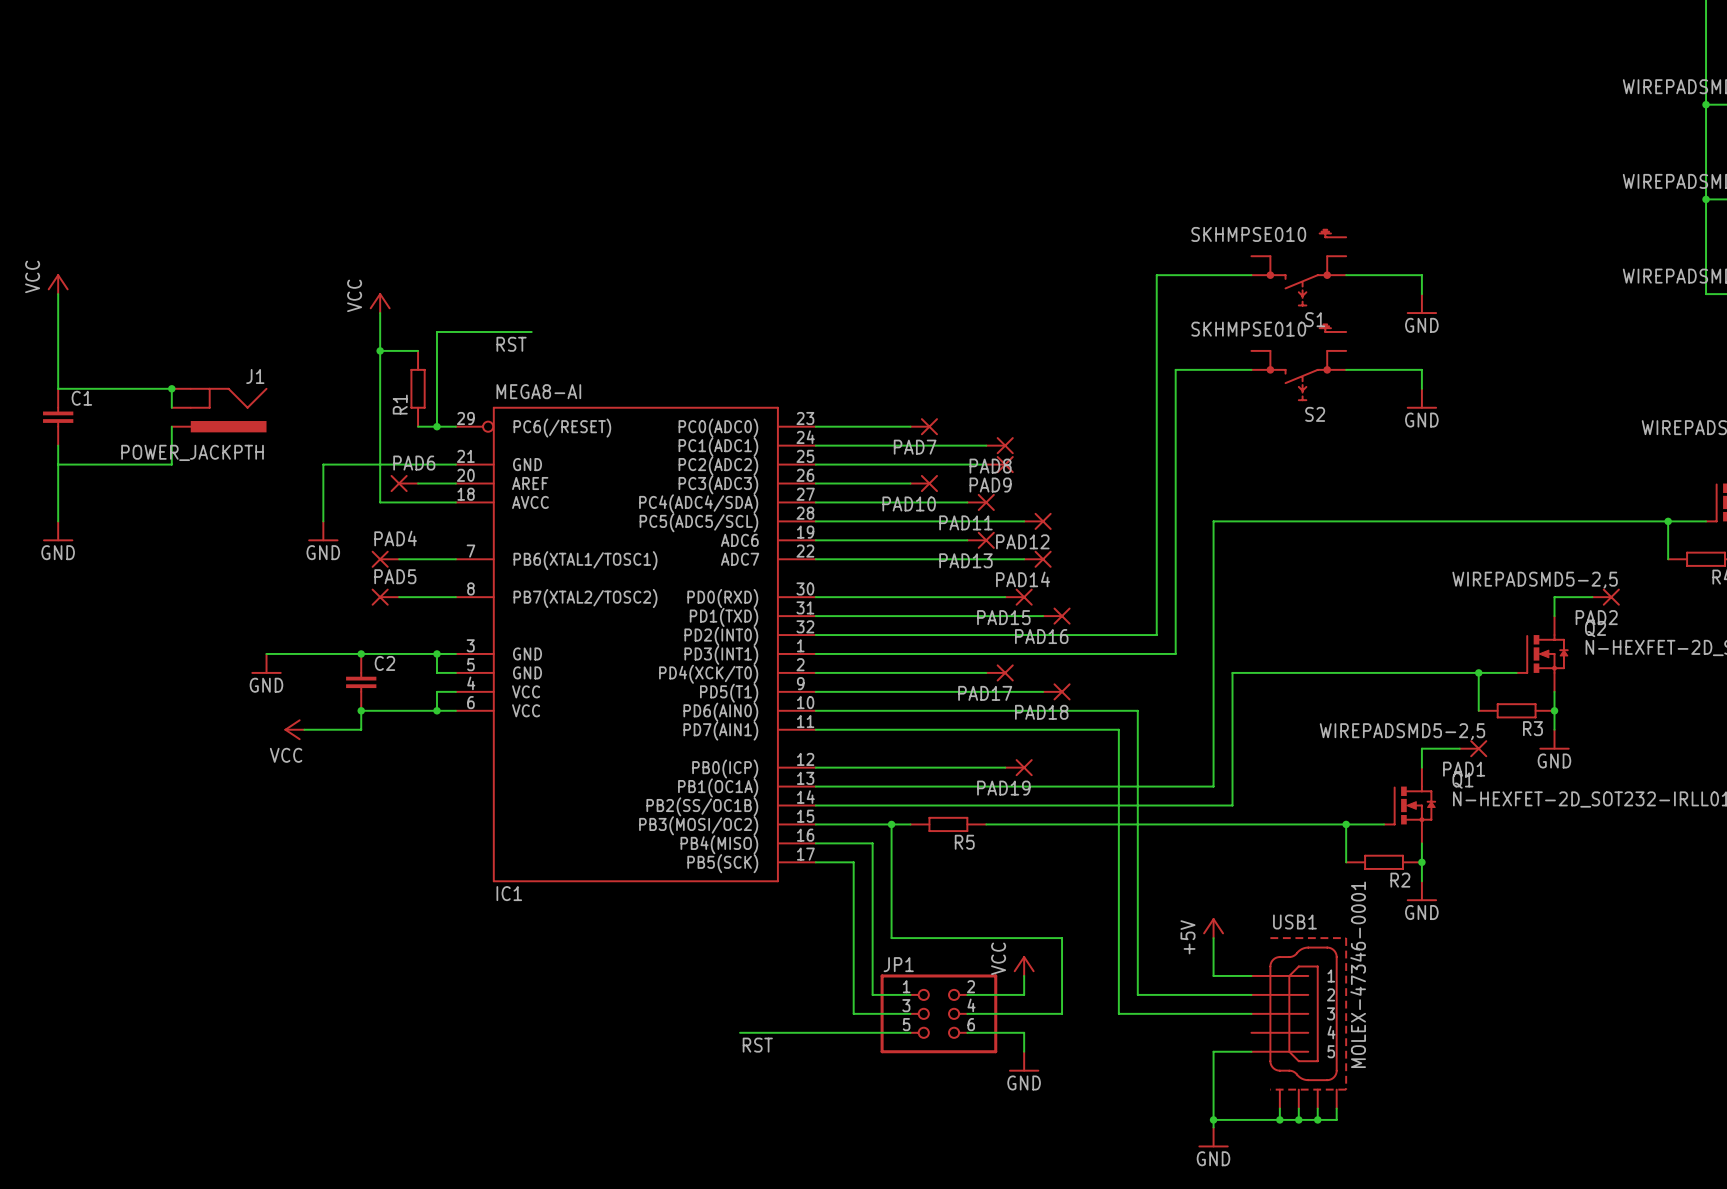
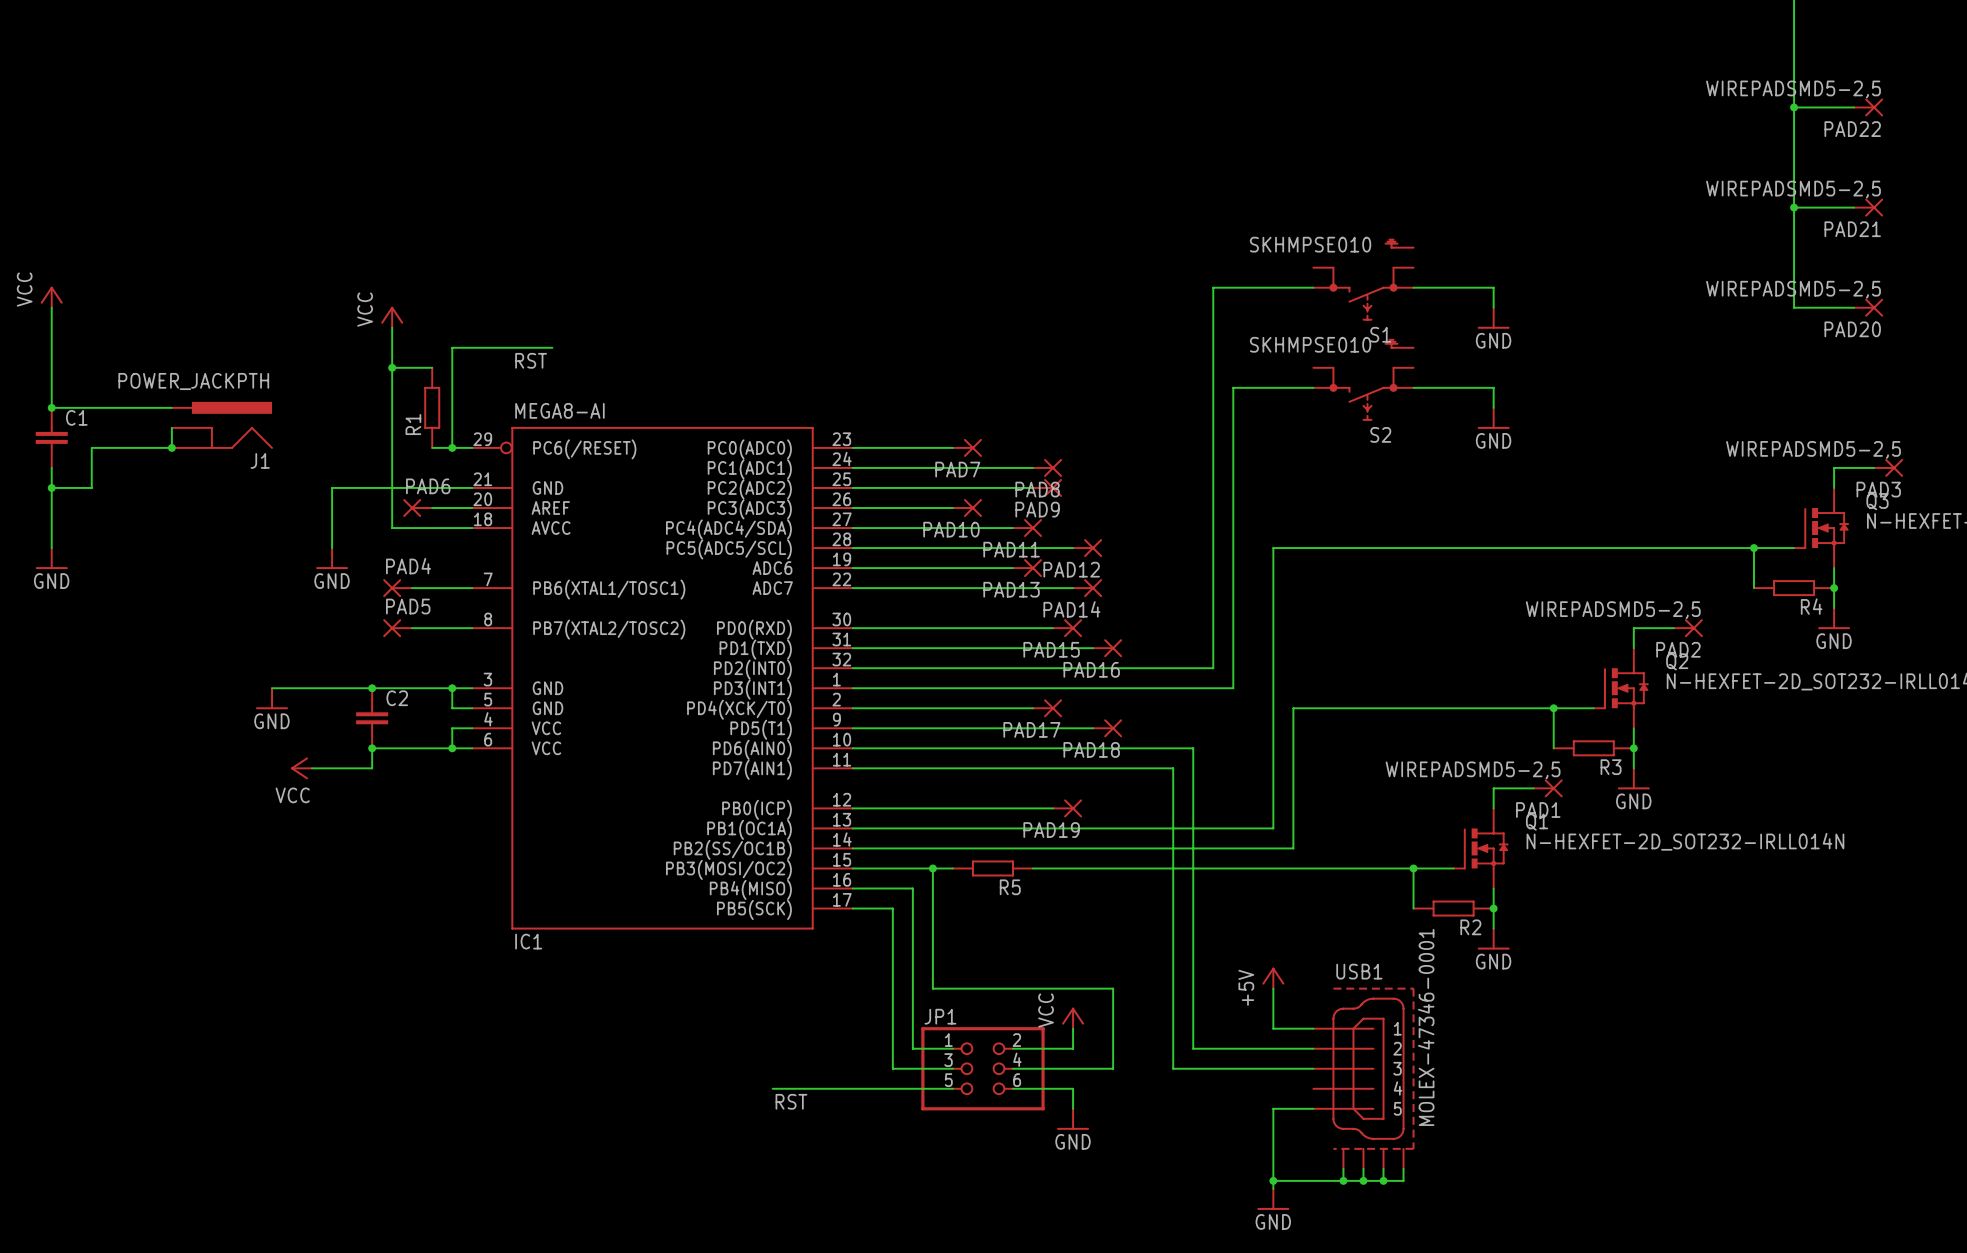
junction: none -> (51, 407)
wire: (171, 388) (171, 407) -> none
junction position: (171, 388) -> (171, 447)
J1 flip: as is (228, 410) -> up-down (231, 425)
wire: (171, 426) (171, 464) (96, 464) -> (171, 427) (171, 447) (91, 447) (91, 487)
junction: none -> (51, 487)

